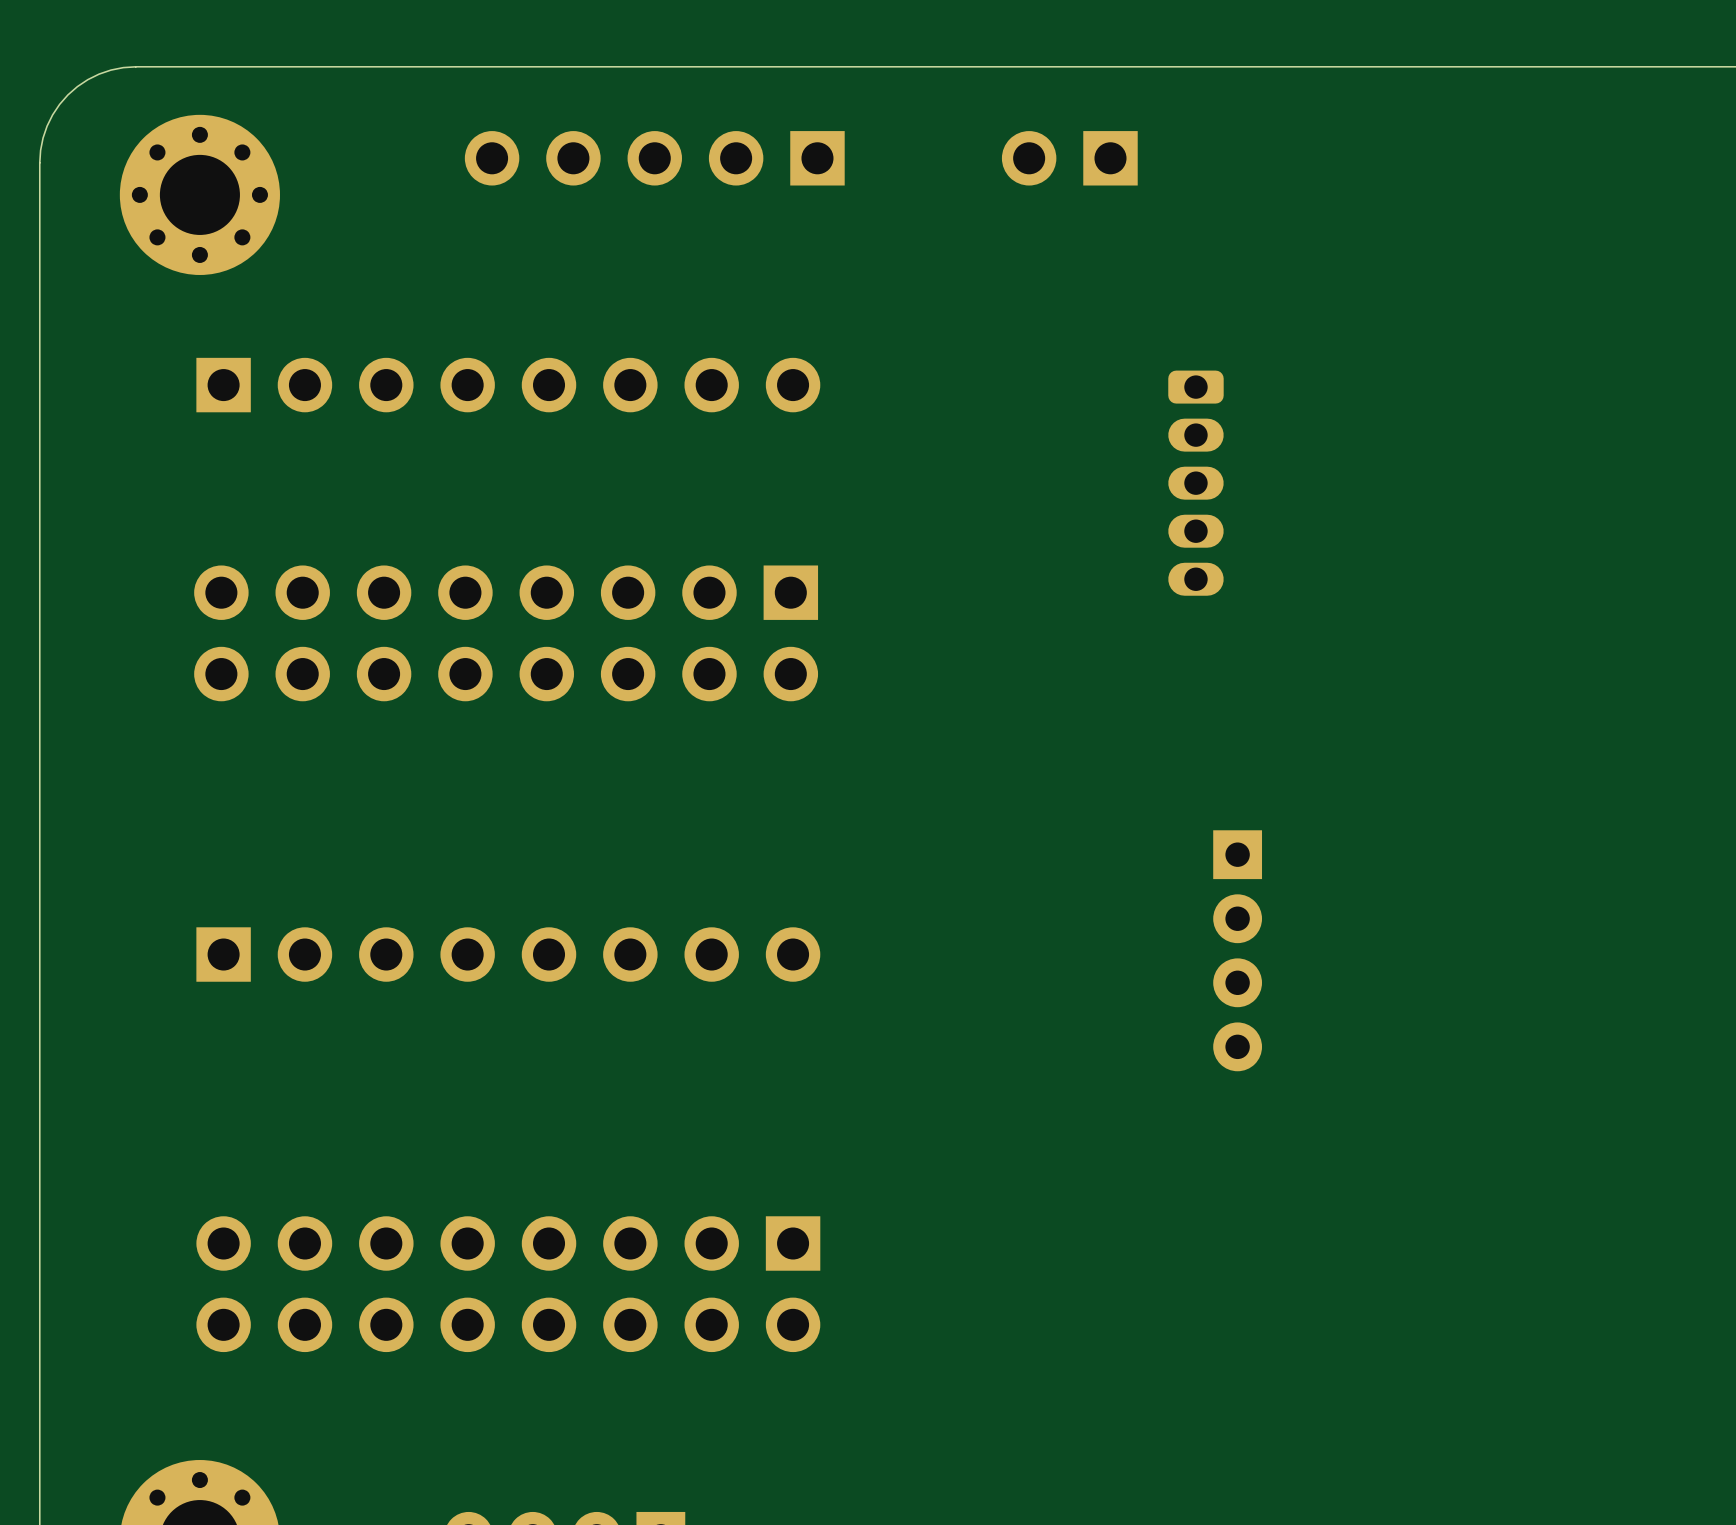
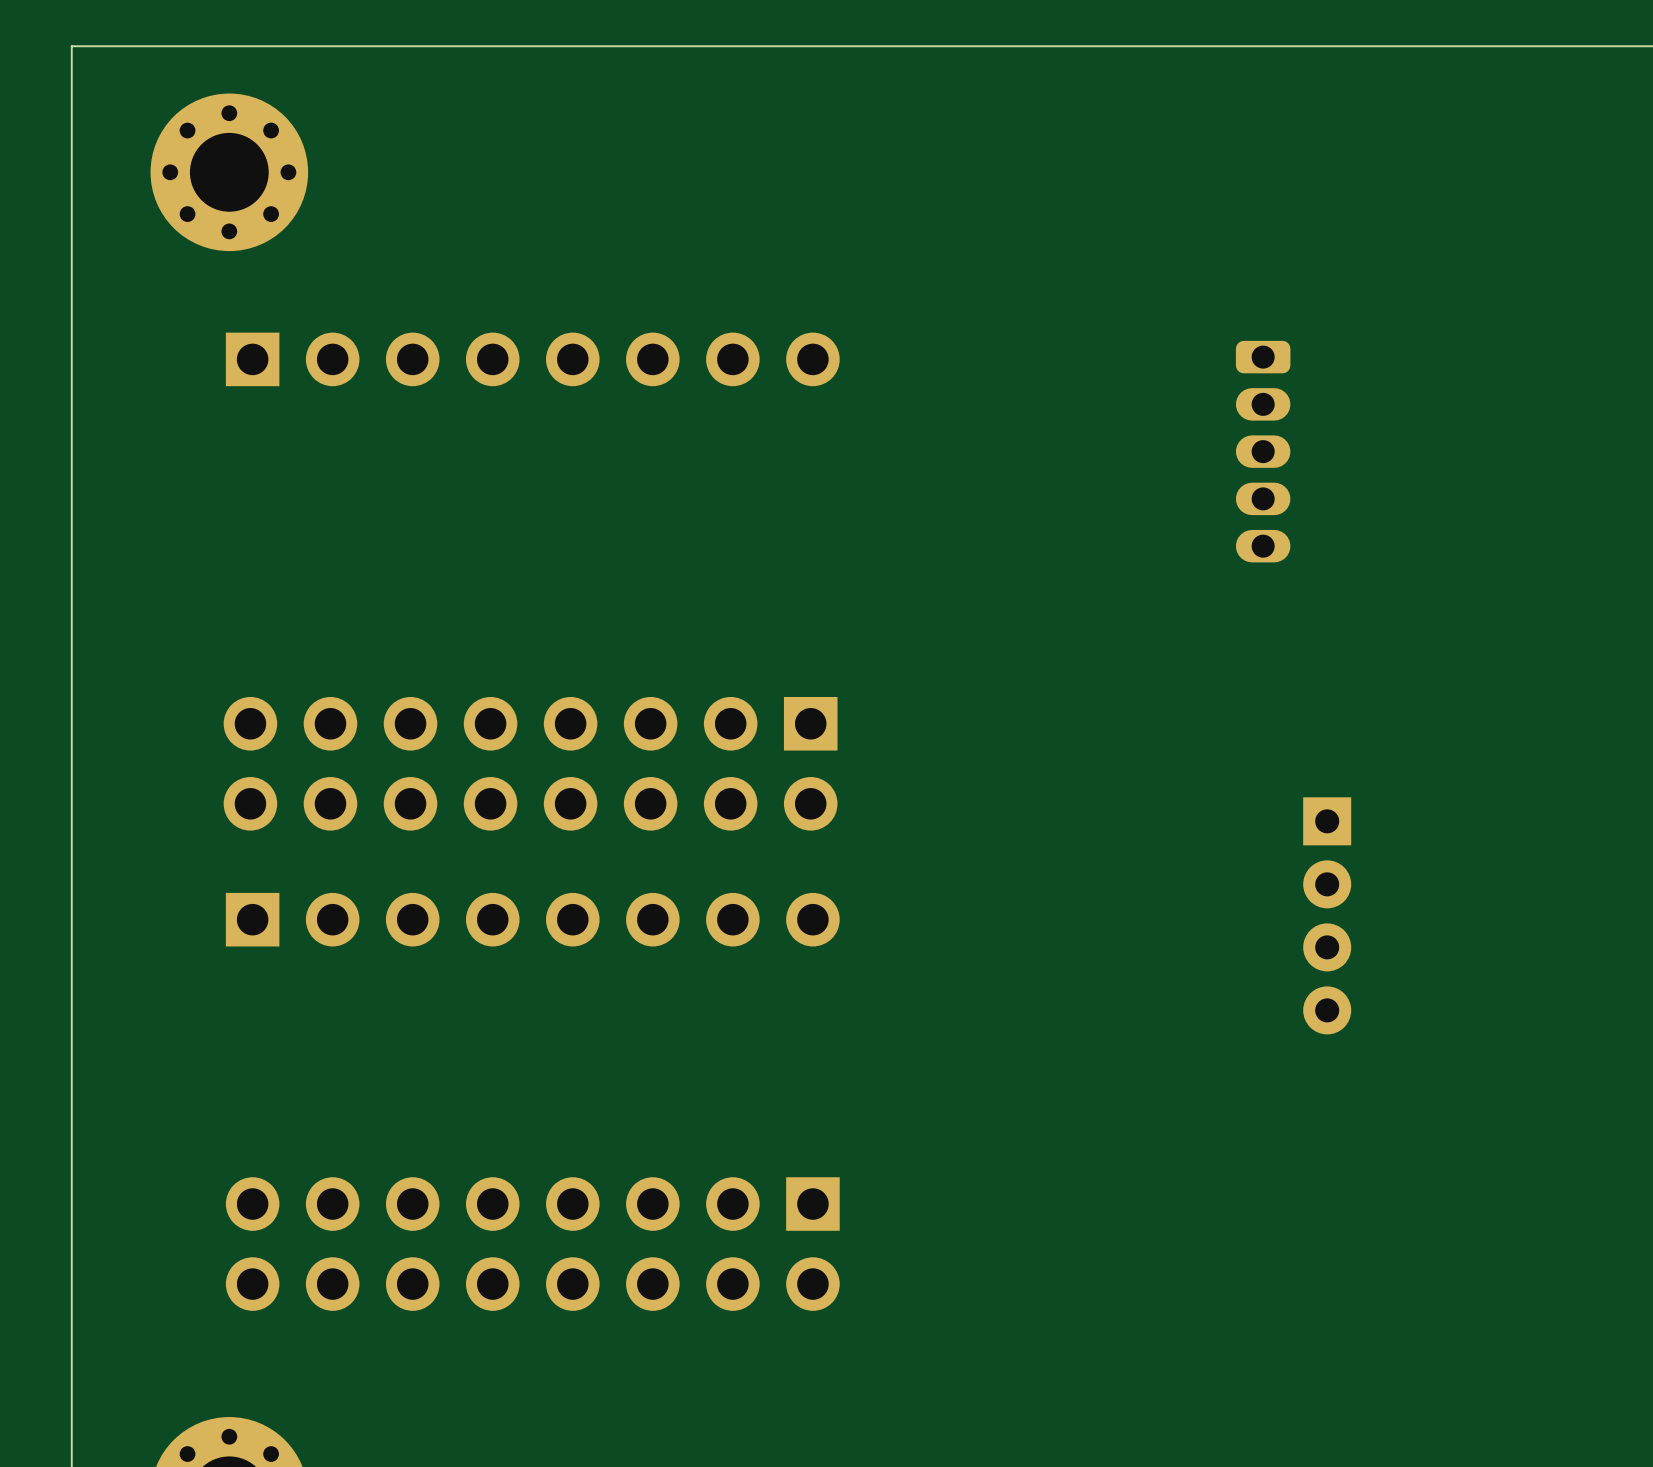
board edge: (135, 66) (110, 70) (99, 74) (77, 86) (67, 94) (59, 104) (47, 126) (43, 138) (39, 162) -> (166, 46) (71, 46) (71, 140)
part: (654, 158) -> none
part: (1069, 158) -> none
part position: (1195, 483) -> (1263, 451)
part position: (506, 633) -> (530, 763)
part position: (1237, 950) -> (1327, 915)

